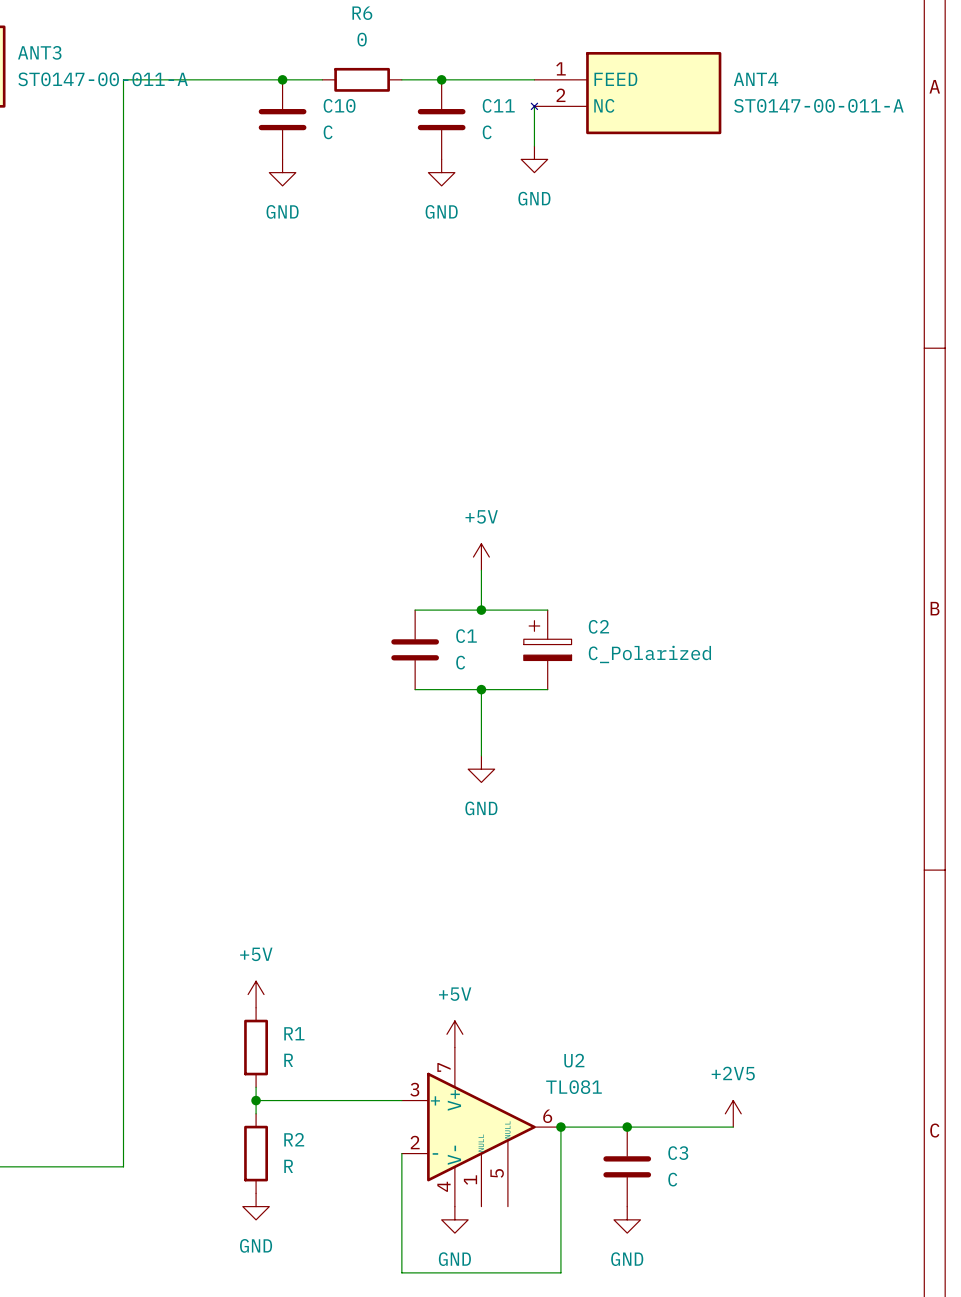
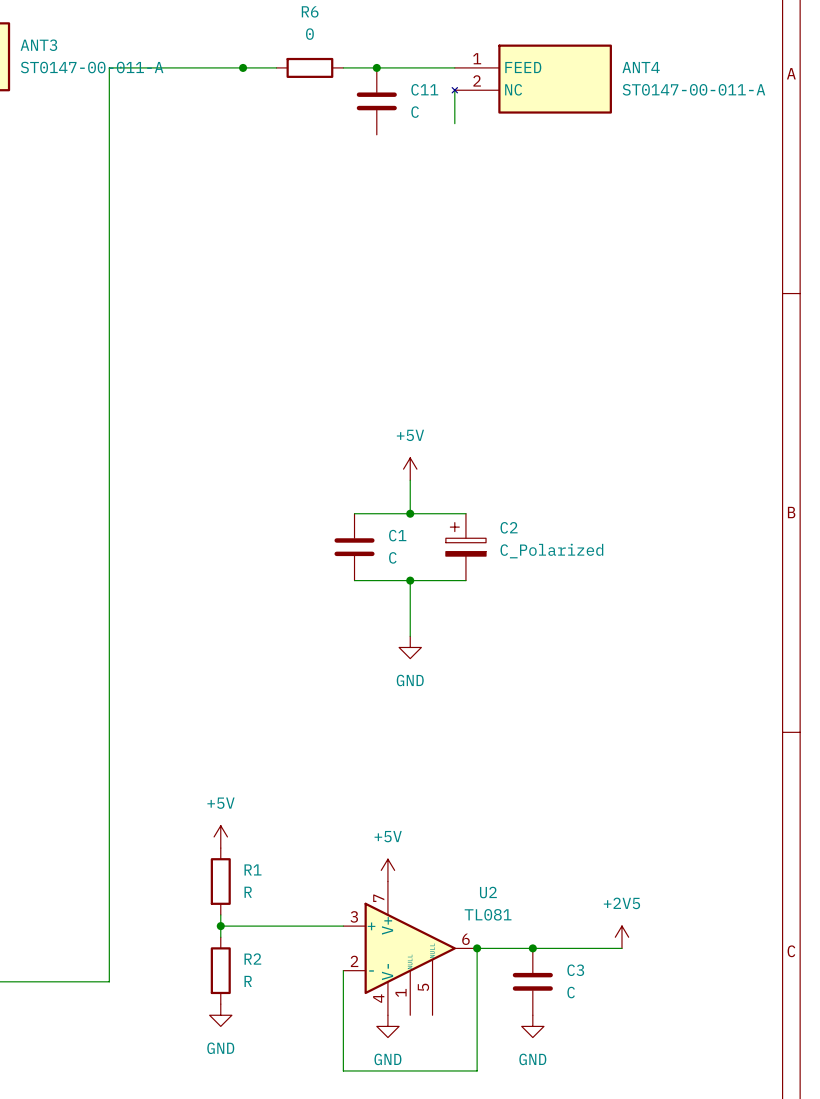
C10: C (282, 119) -> none
power symbol: GND (534, 159) -> none
power symbol: GND (282, 172) -> none
power symbol: GND (441, 172) -> none

